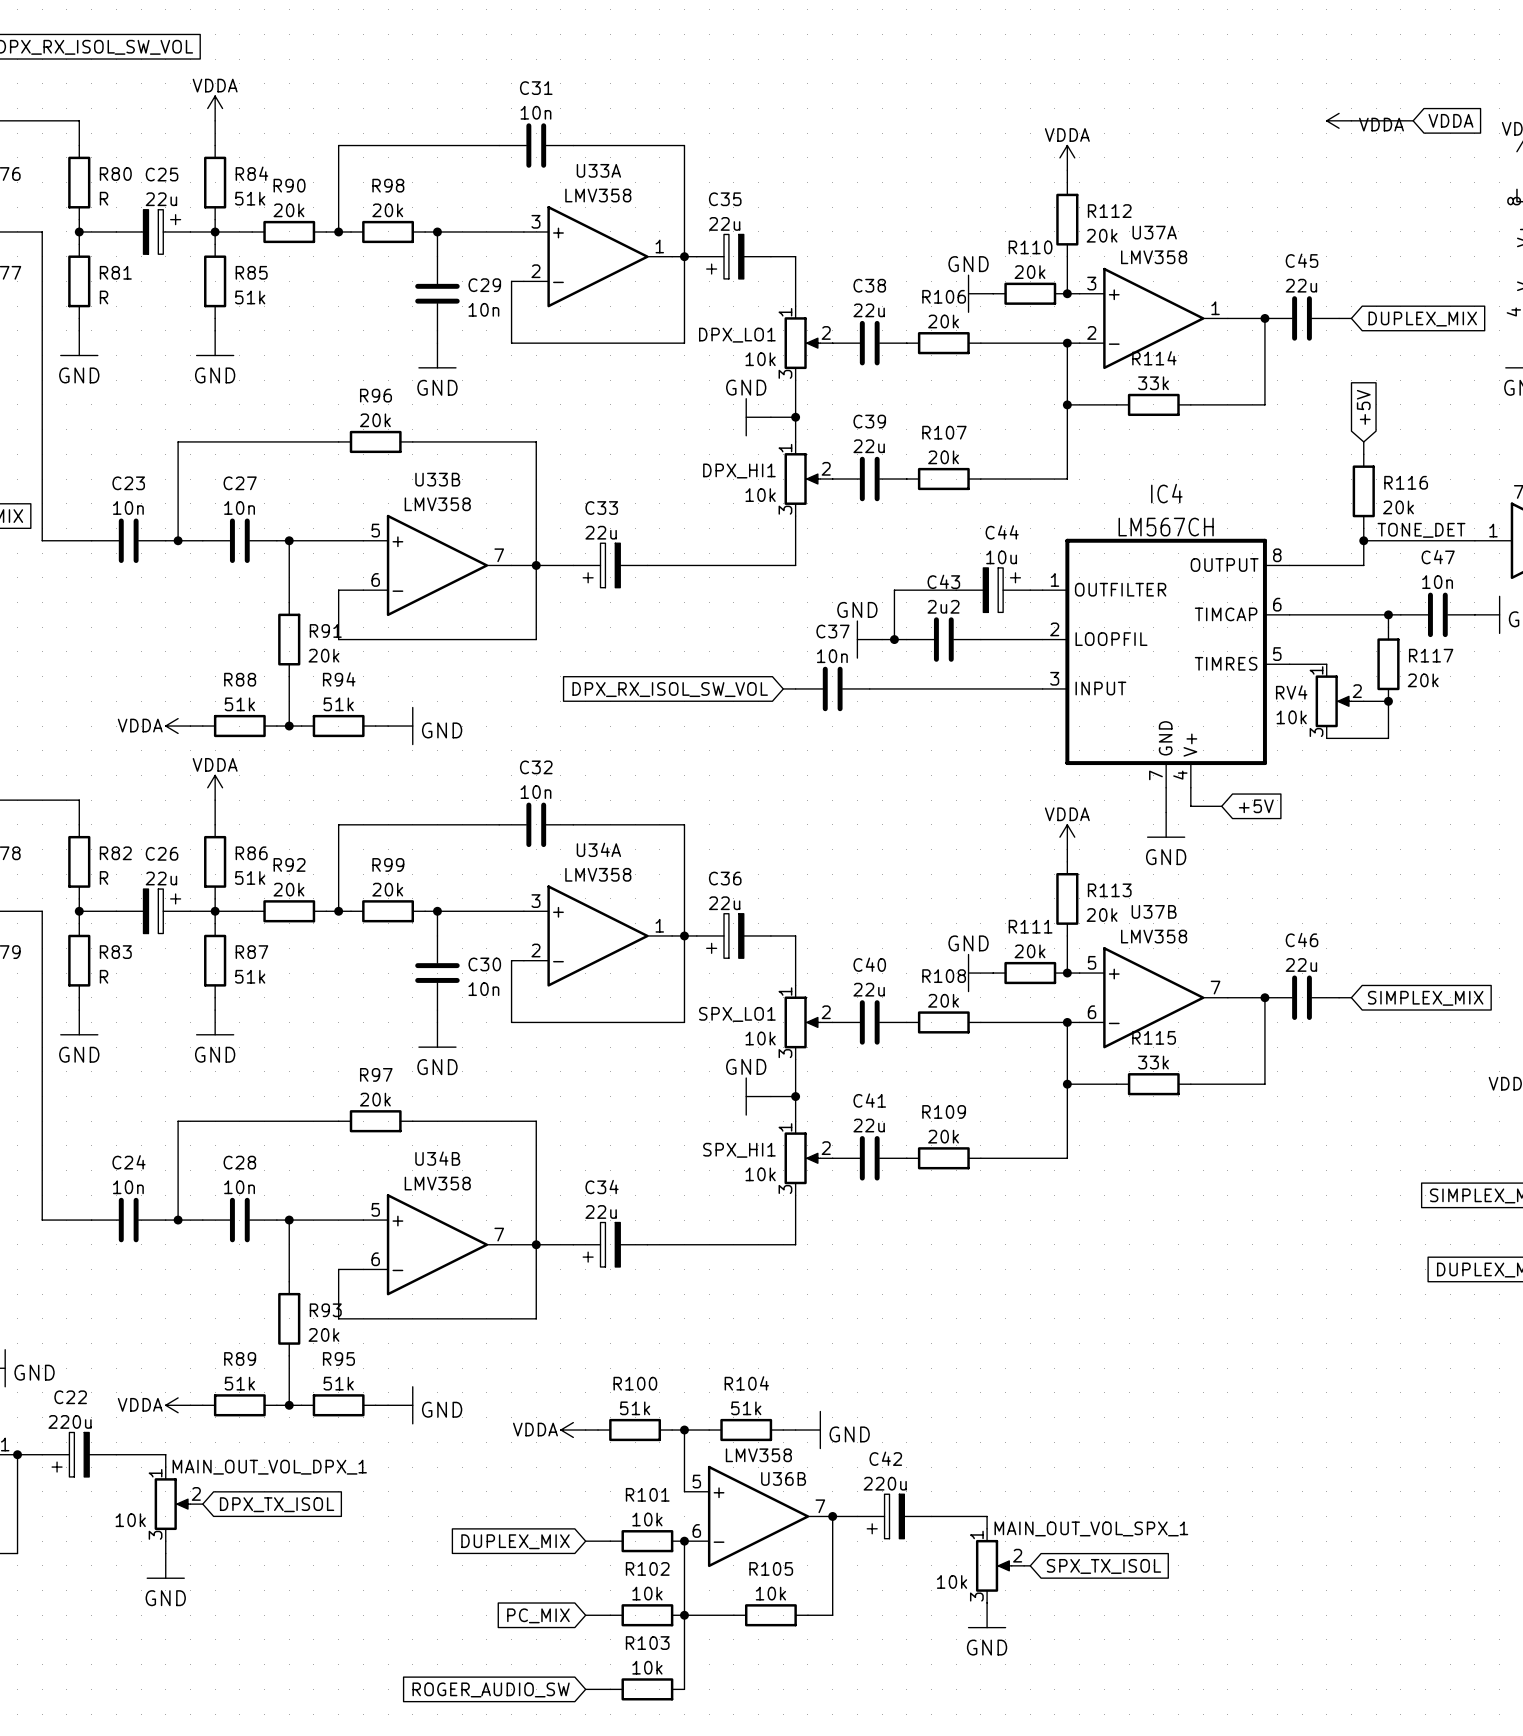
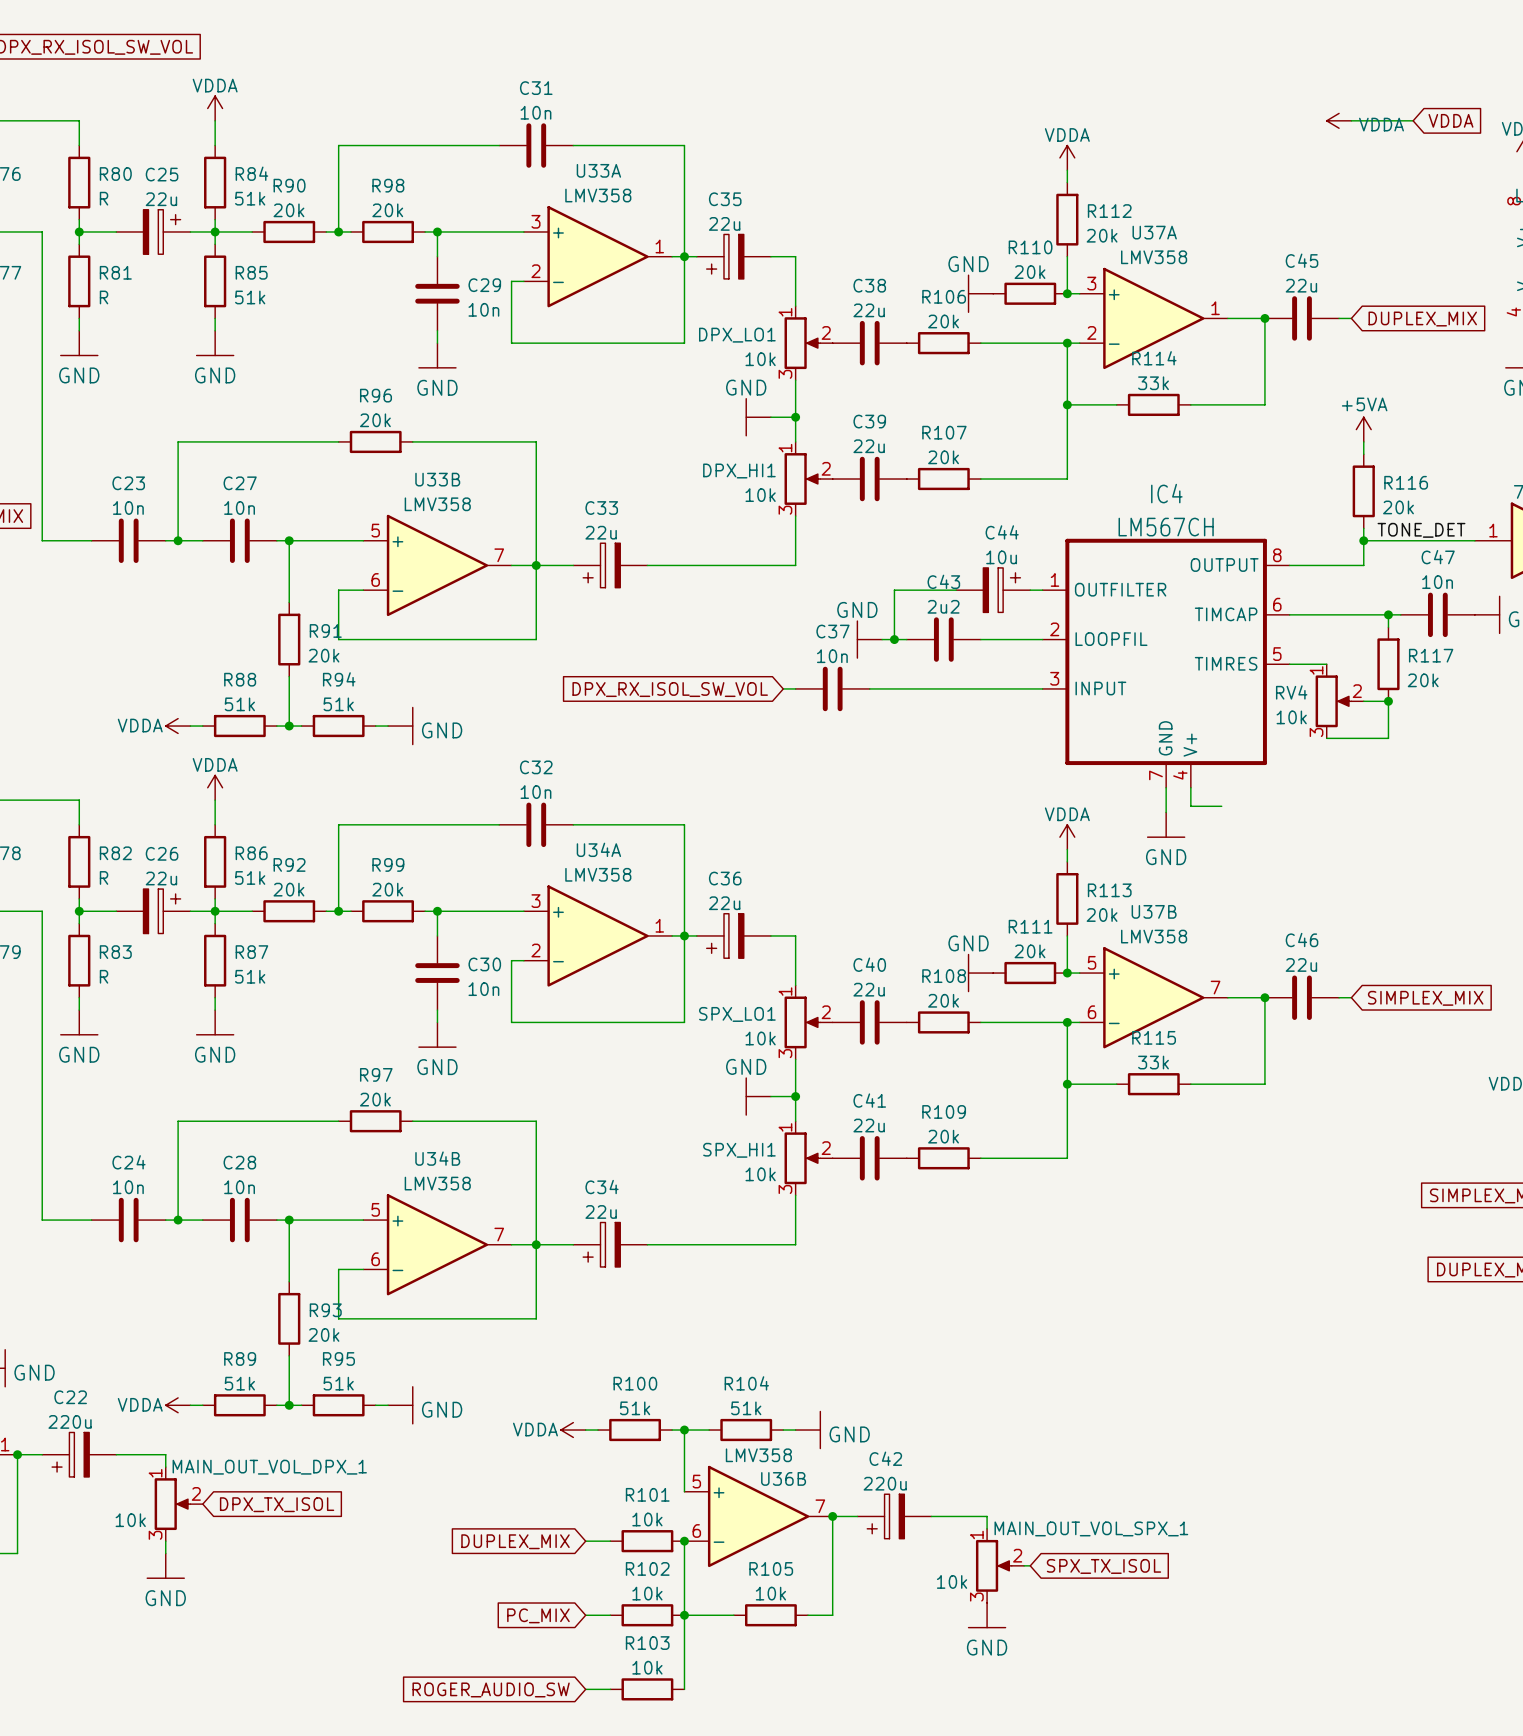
global label: +5V (1363, 407) -> none
power symbol: none -> +5VA (1363, 429)
global label: +5V (1256, 806) -> none

